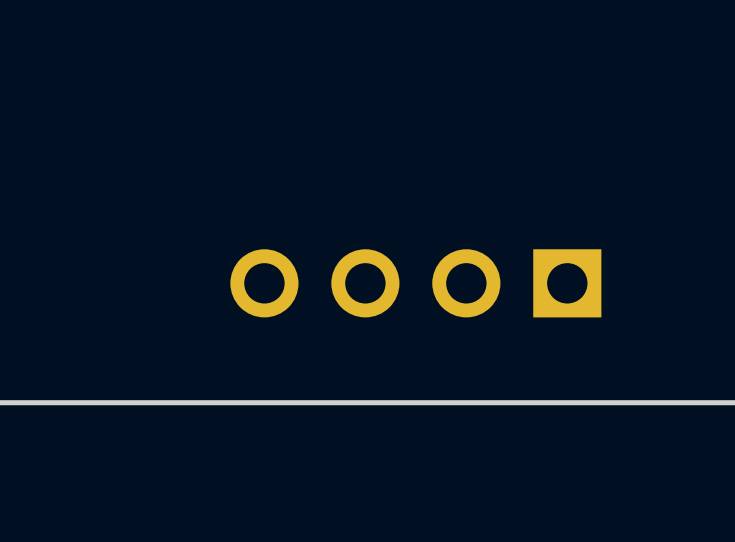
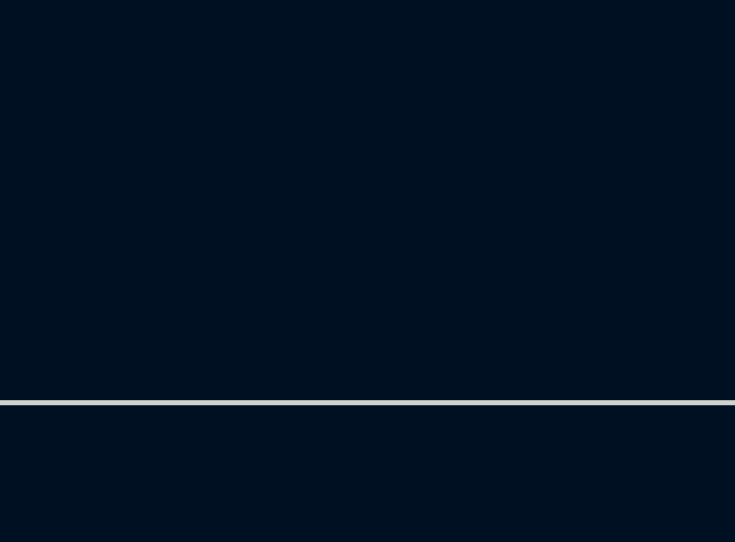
part: (415, 283) -> none

